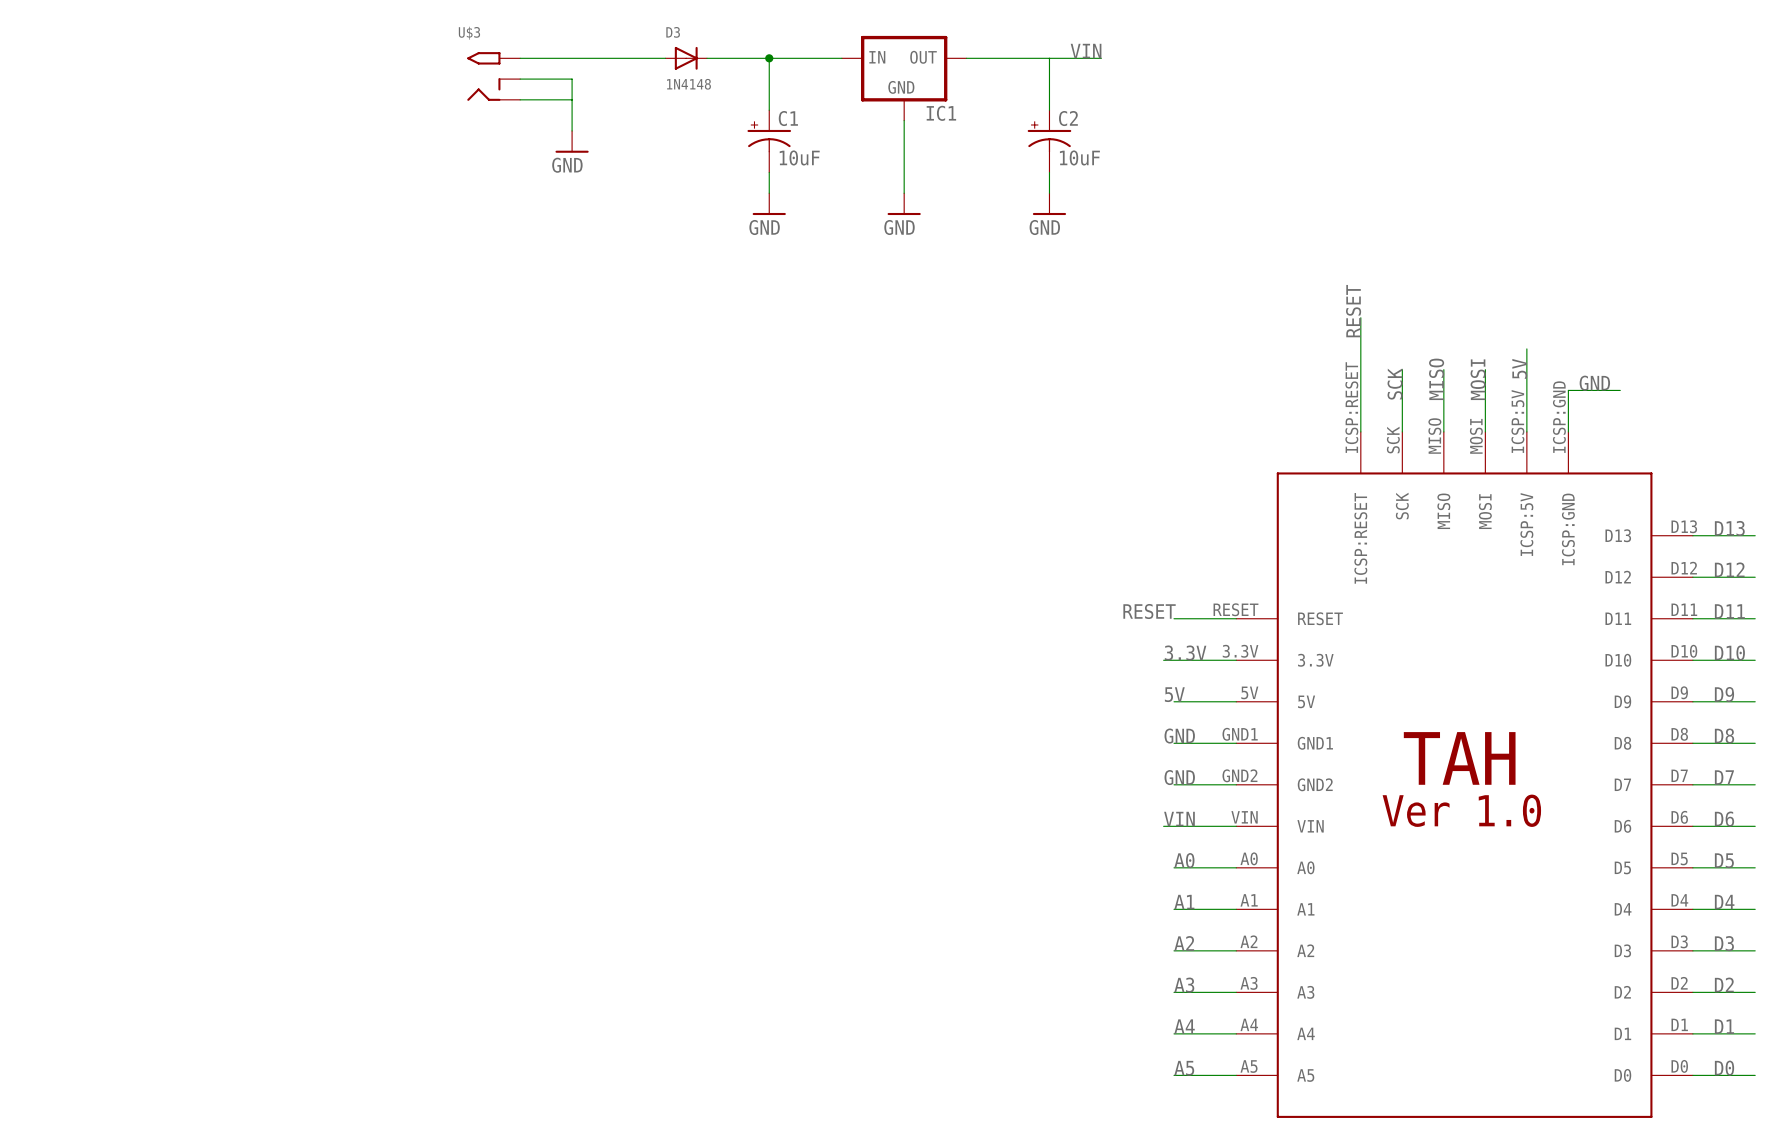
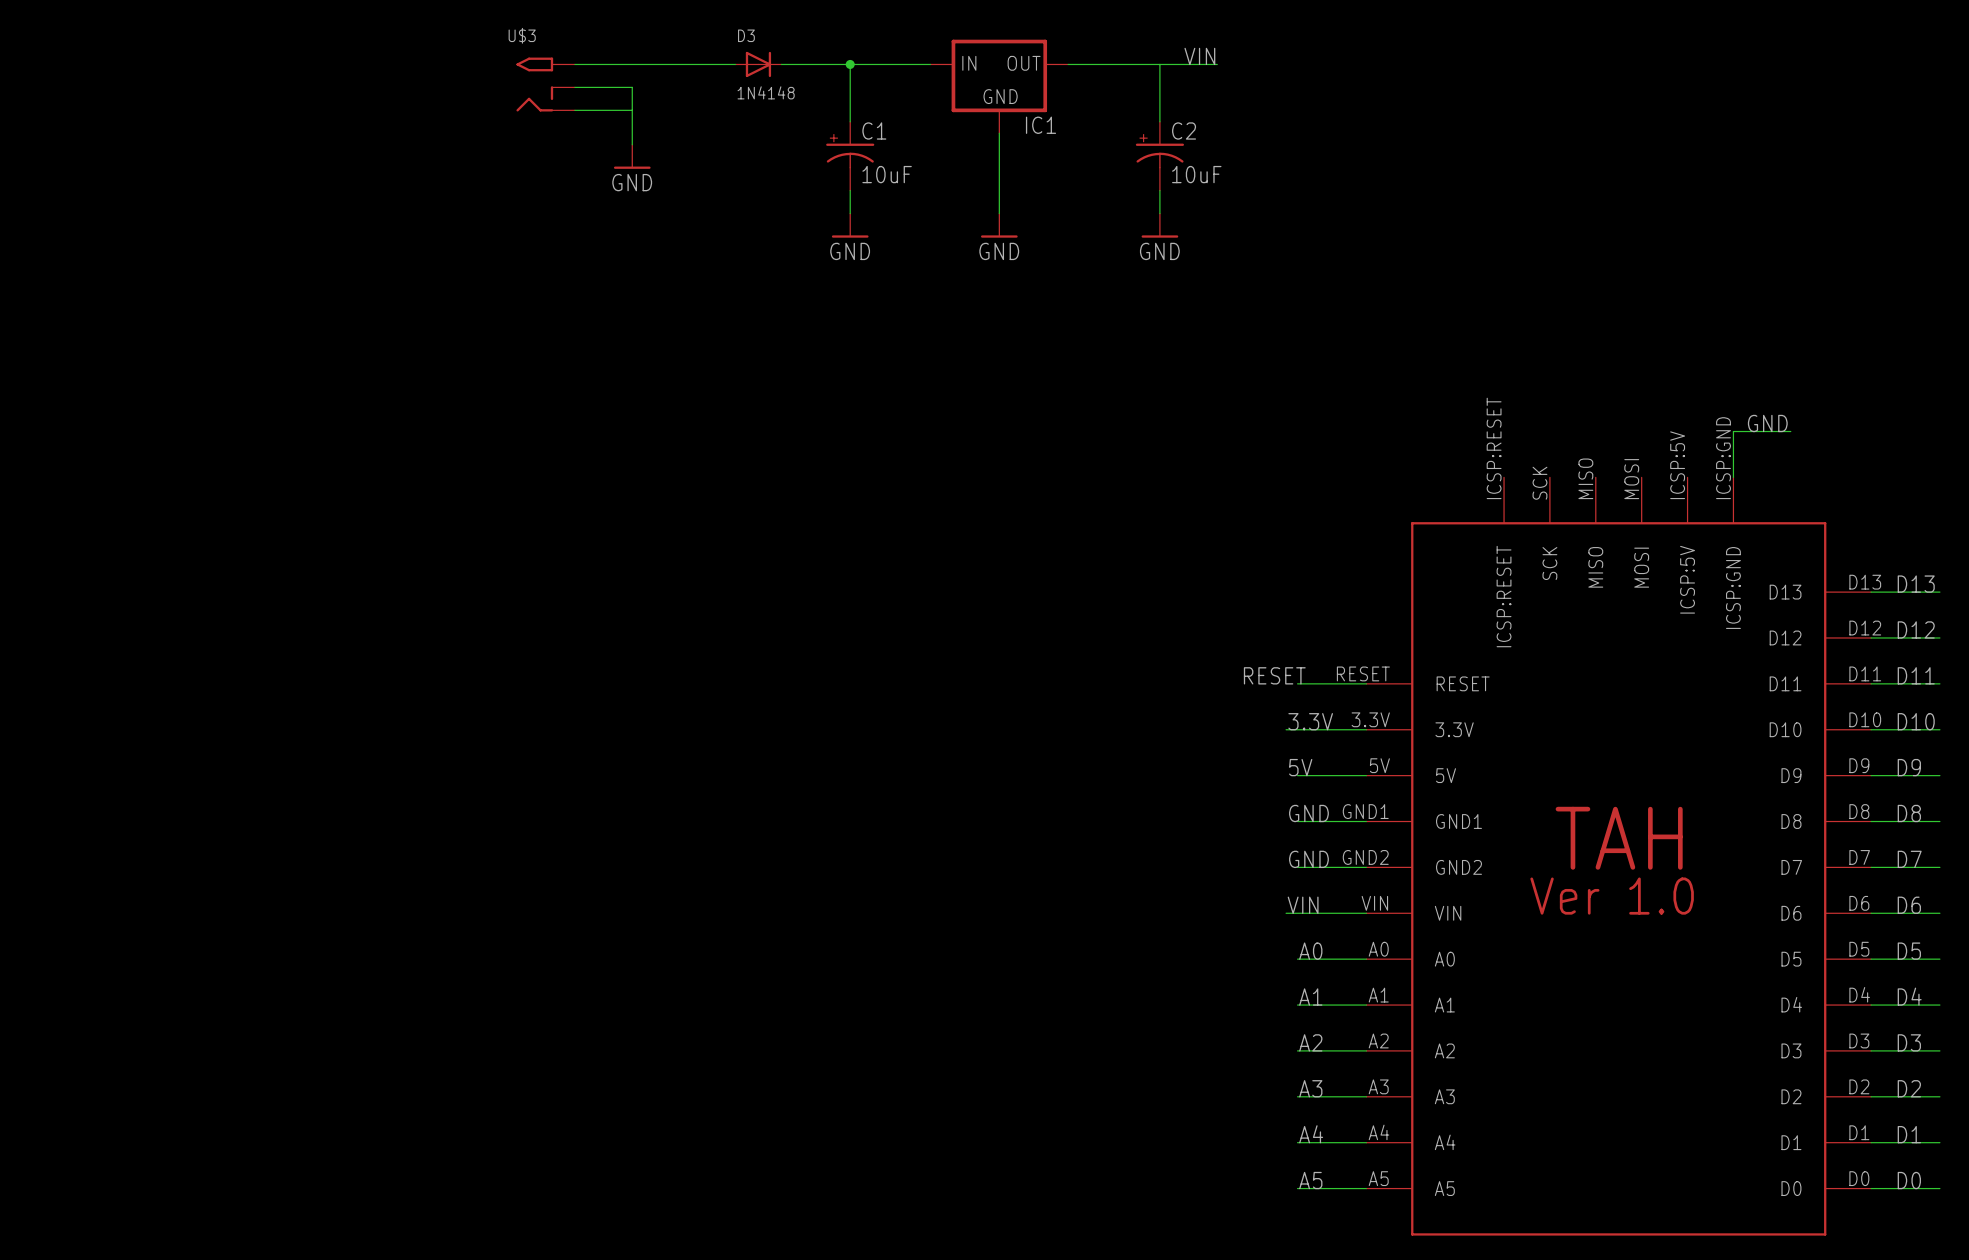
label: RESET (1353, 311) -> none
wire: (1360, 317) (1360, 431) -> none
wire: (1526, 348) (1526, 431) -> none
label: 5V (1519, 368) -> none
wire: (1402, 369) (1402, 431) -> none
wire: (1443, 369) (1443, 431) -> none
wire: (1485, 369) (1485, 431) -> none
label: MISO (1436, 379) -> none
label: MOSI (1478, 379) -> none
label: SCK (1395, 384) -> none

